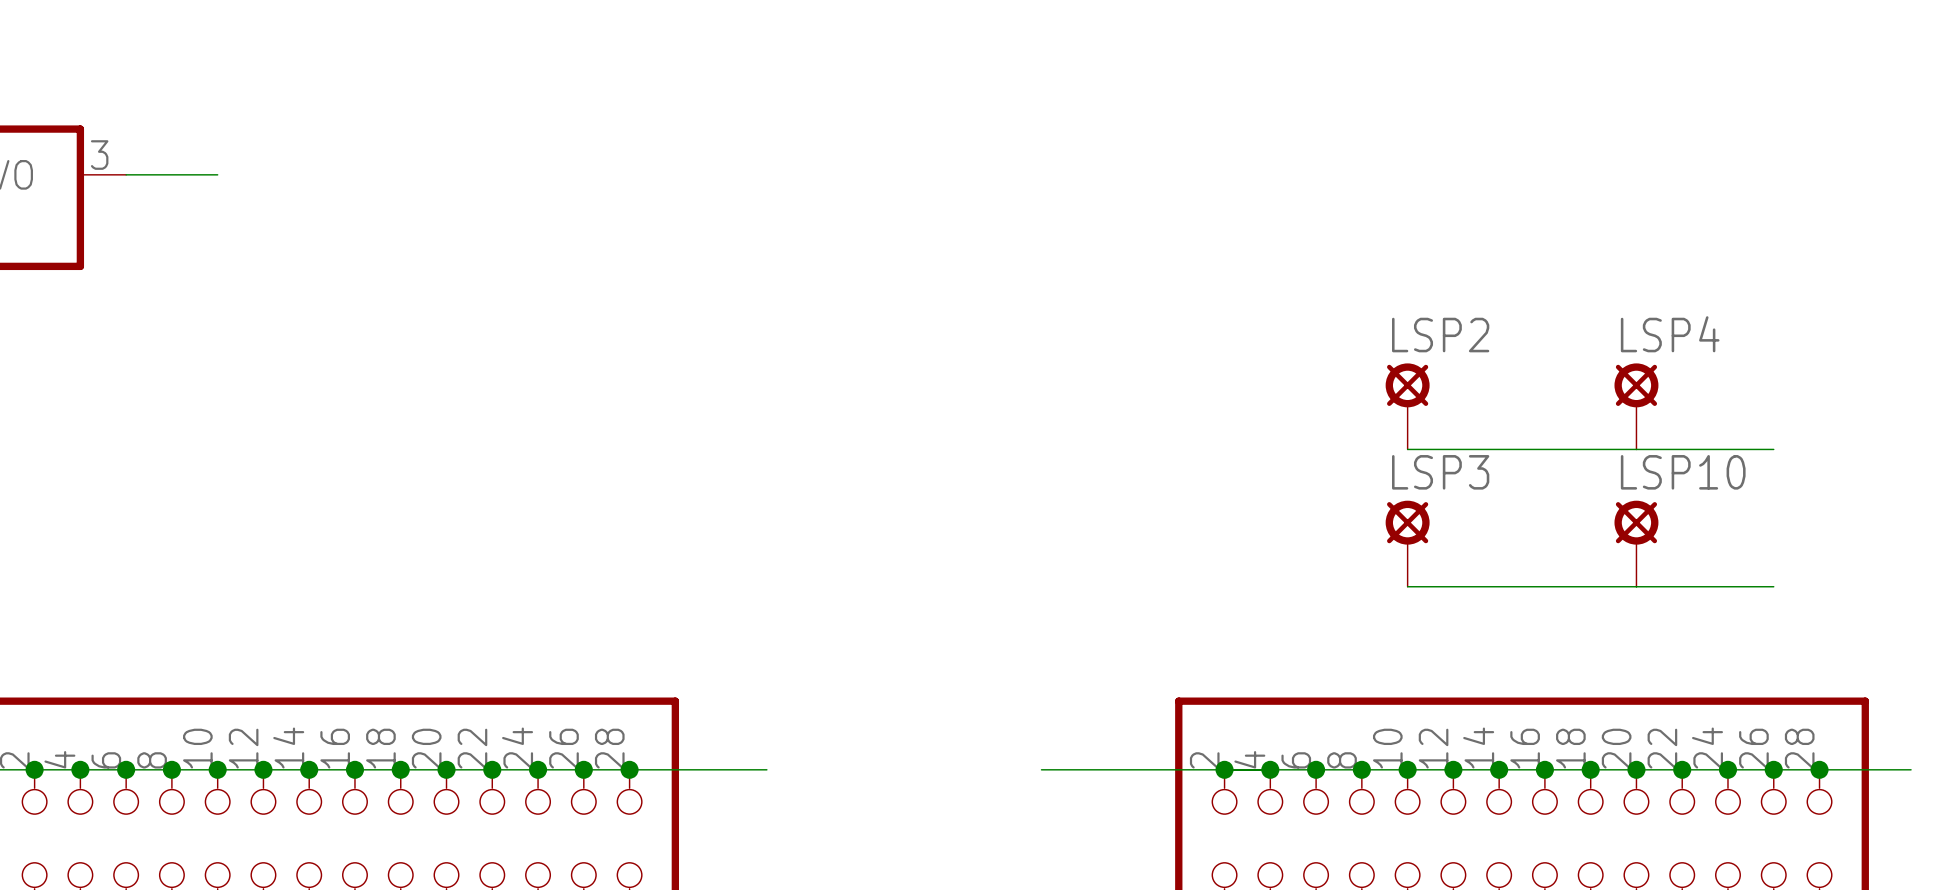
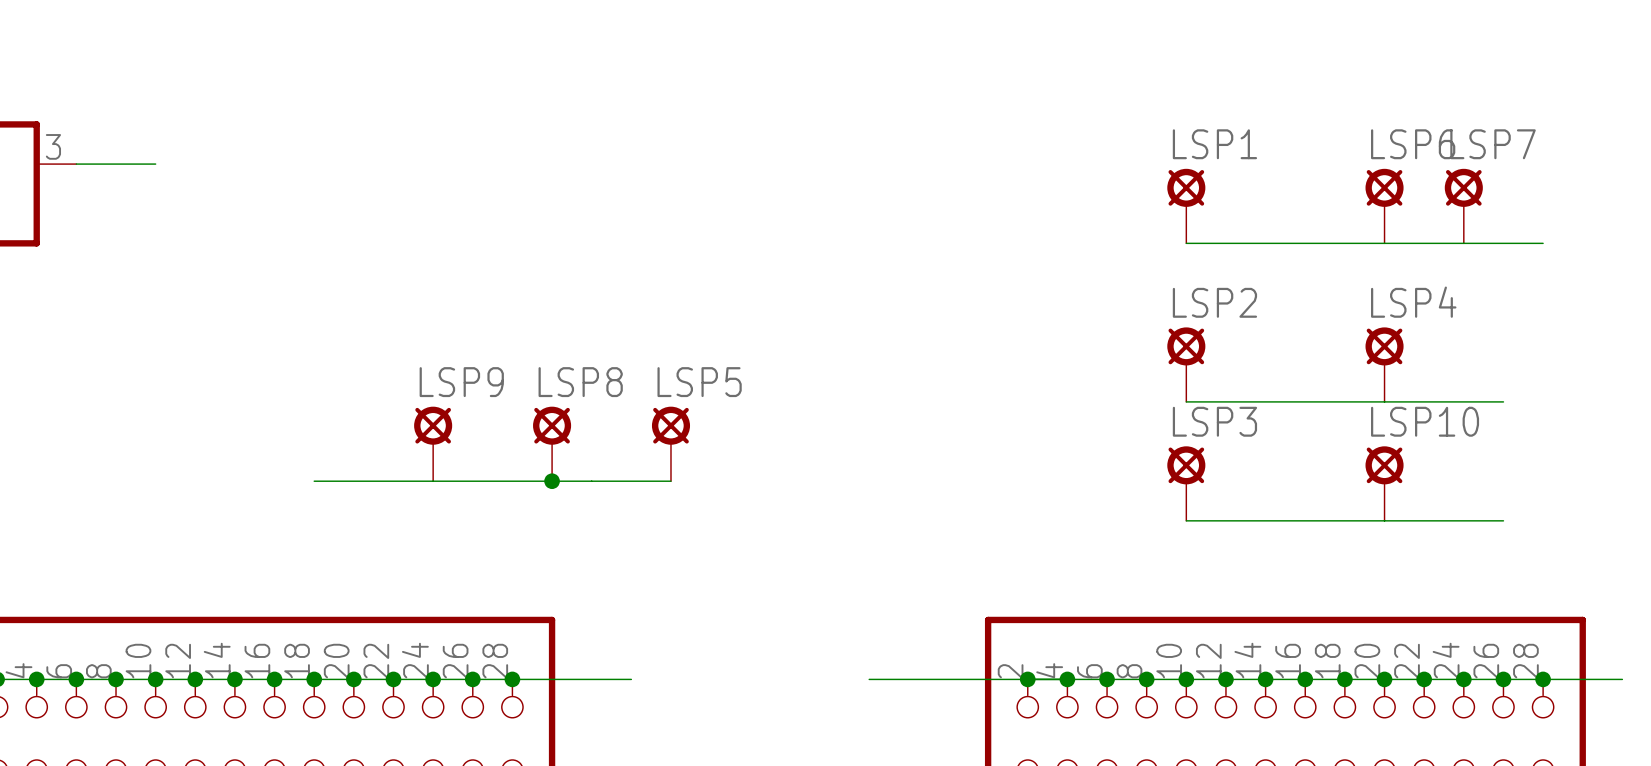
LSP1: none -> (1186, 206)
LSP6: none -> (1384, 206)
LSP7: none -> (1463, 206)
wire: none -> (1186, 243) (1543, 243)
LSP9: none -> (433, 443)
LSP8: none -> (552, 443)
LSP5: none -> (670, 443)
wire: none -> (314, 481) (670, 481)
junction: none -> (552, 481)

